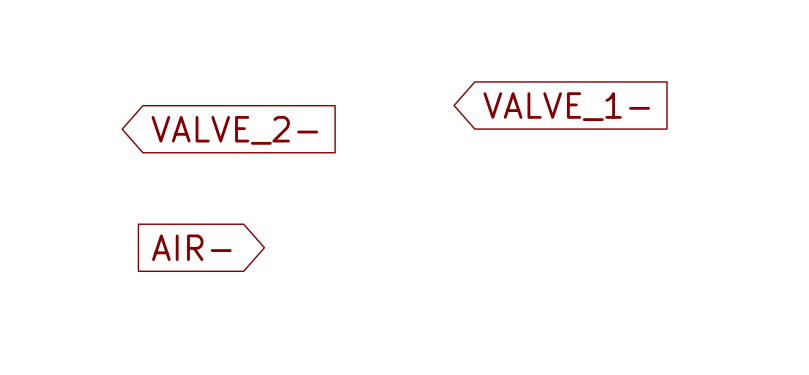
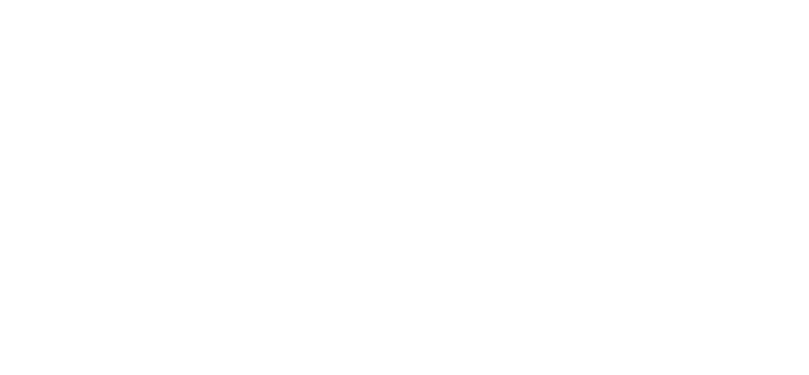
global label: VALVE_1- (566, 106) -> none
global label: VALVE_2- (234, 130) -> none
global label: AIR- (191, 247) -> none

